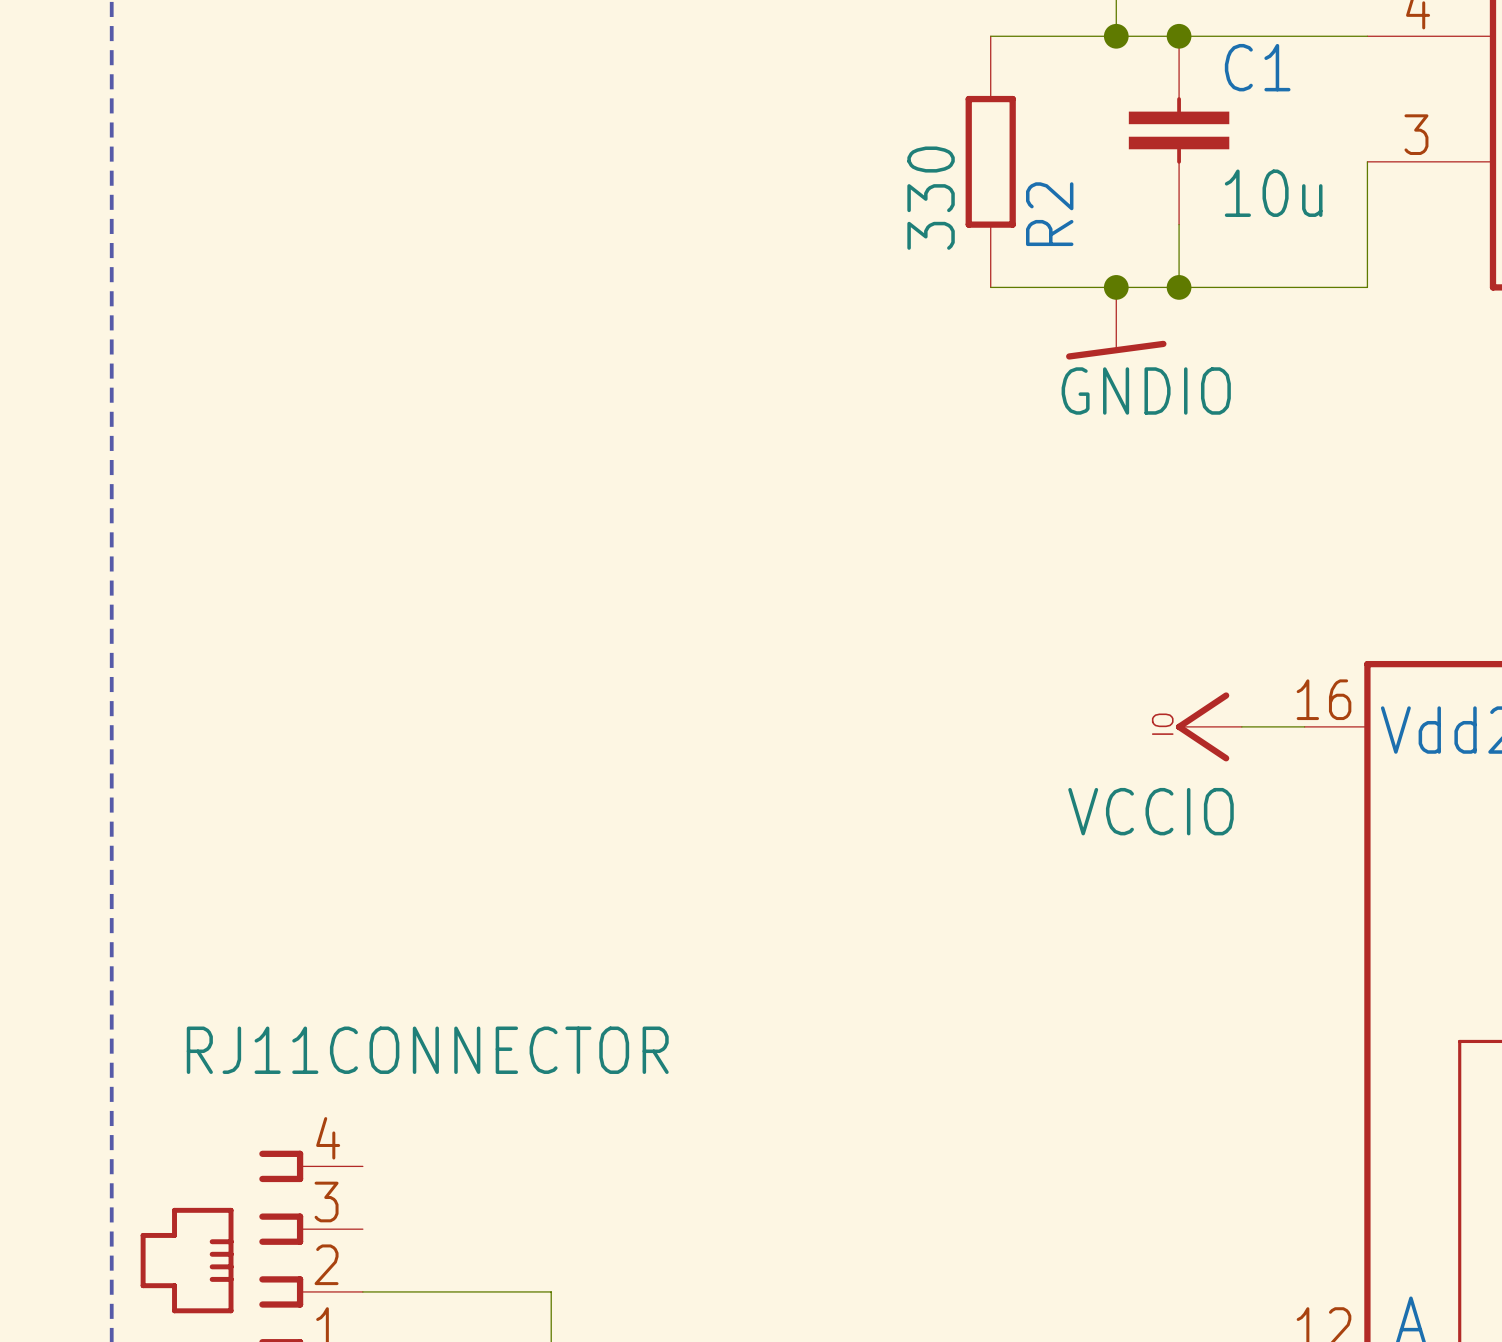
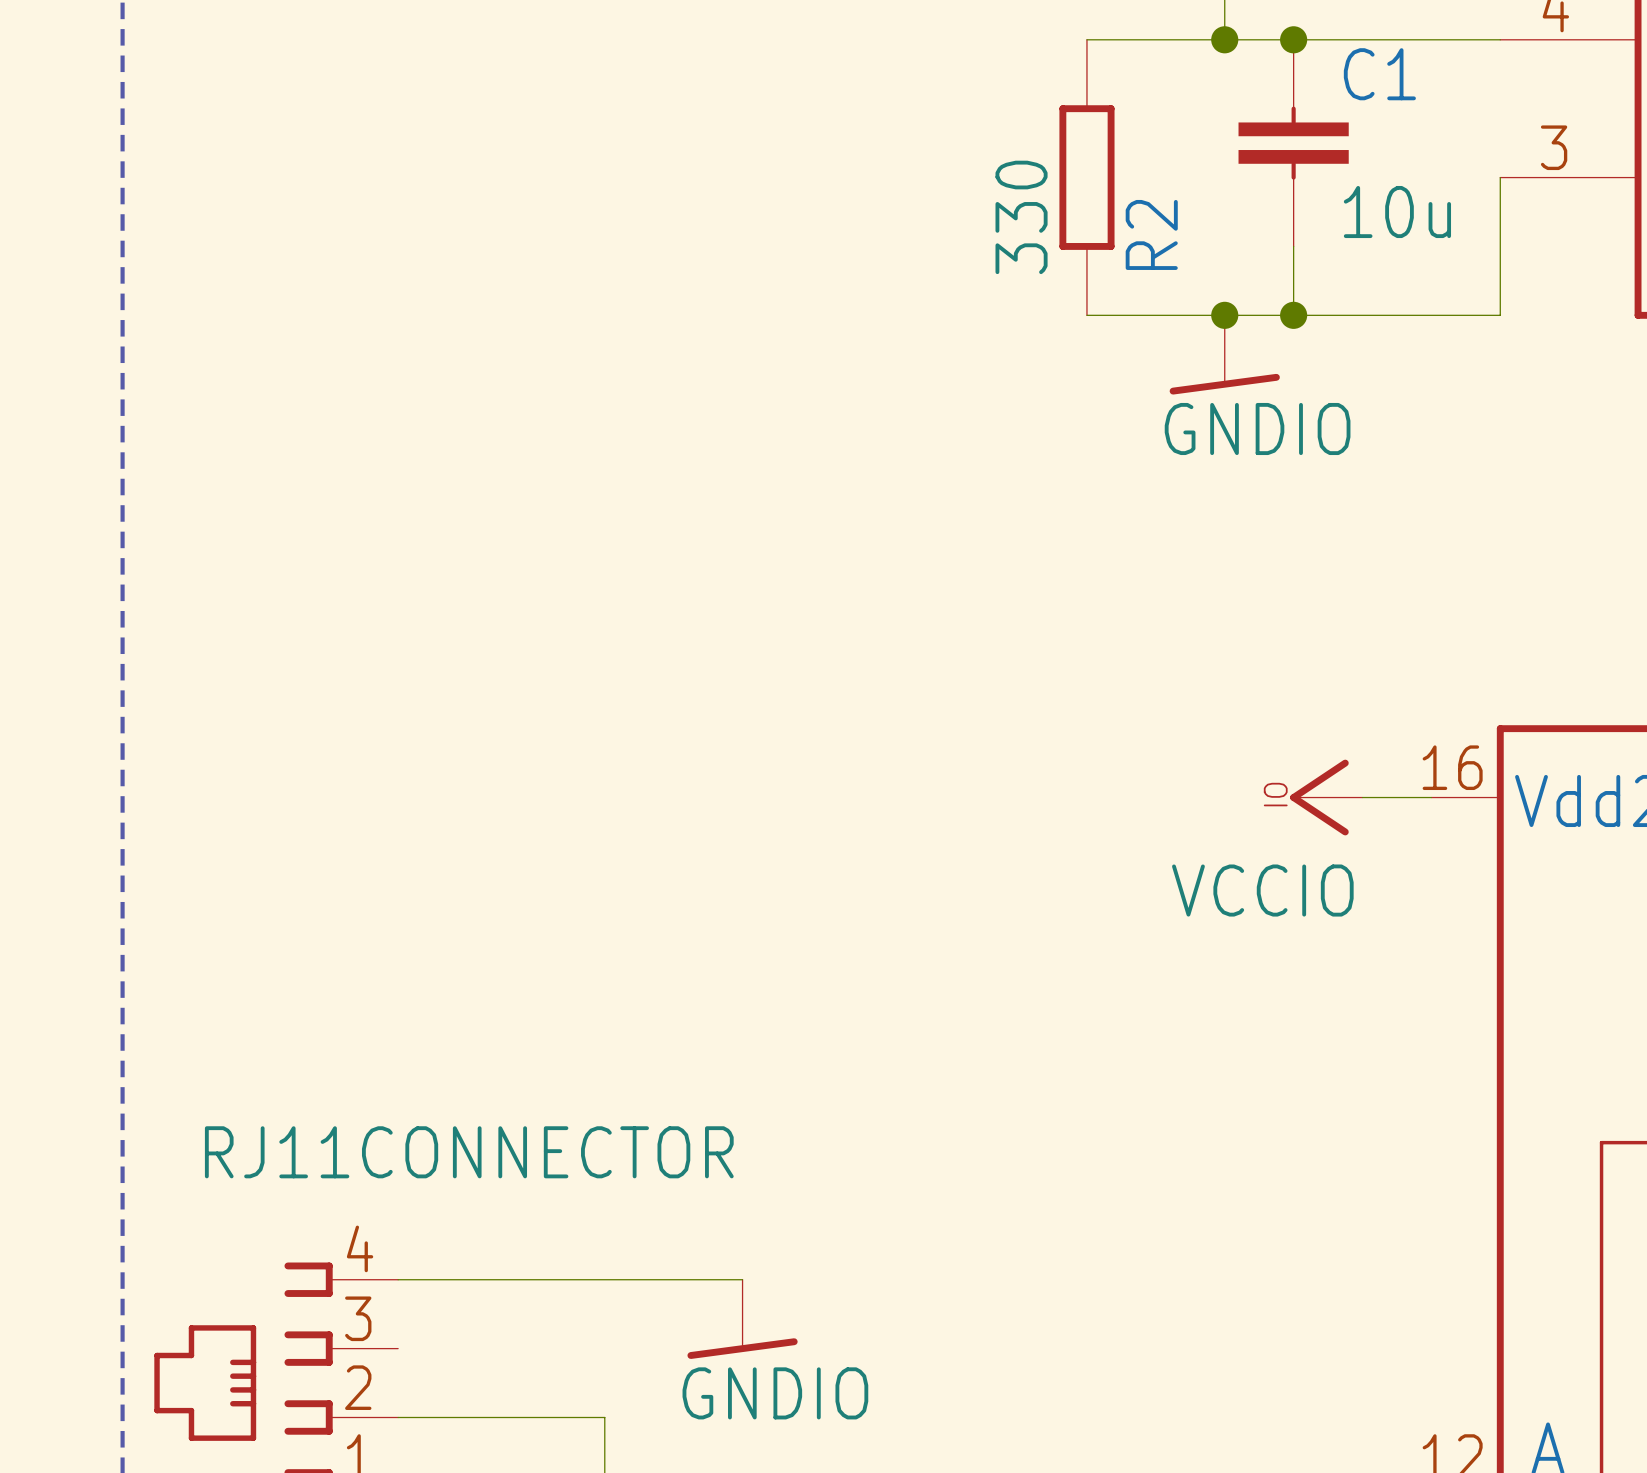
wire: none -> (398, 1279) (742, 1279)
power symbol: none -> GNDIO (742, 1319)

